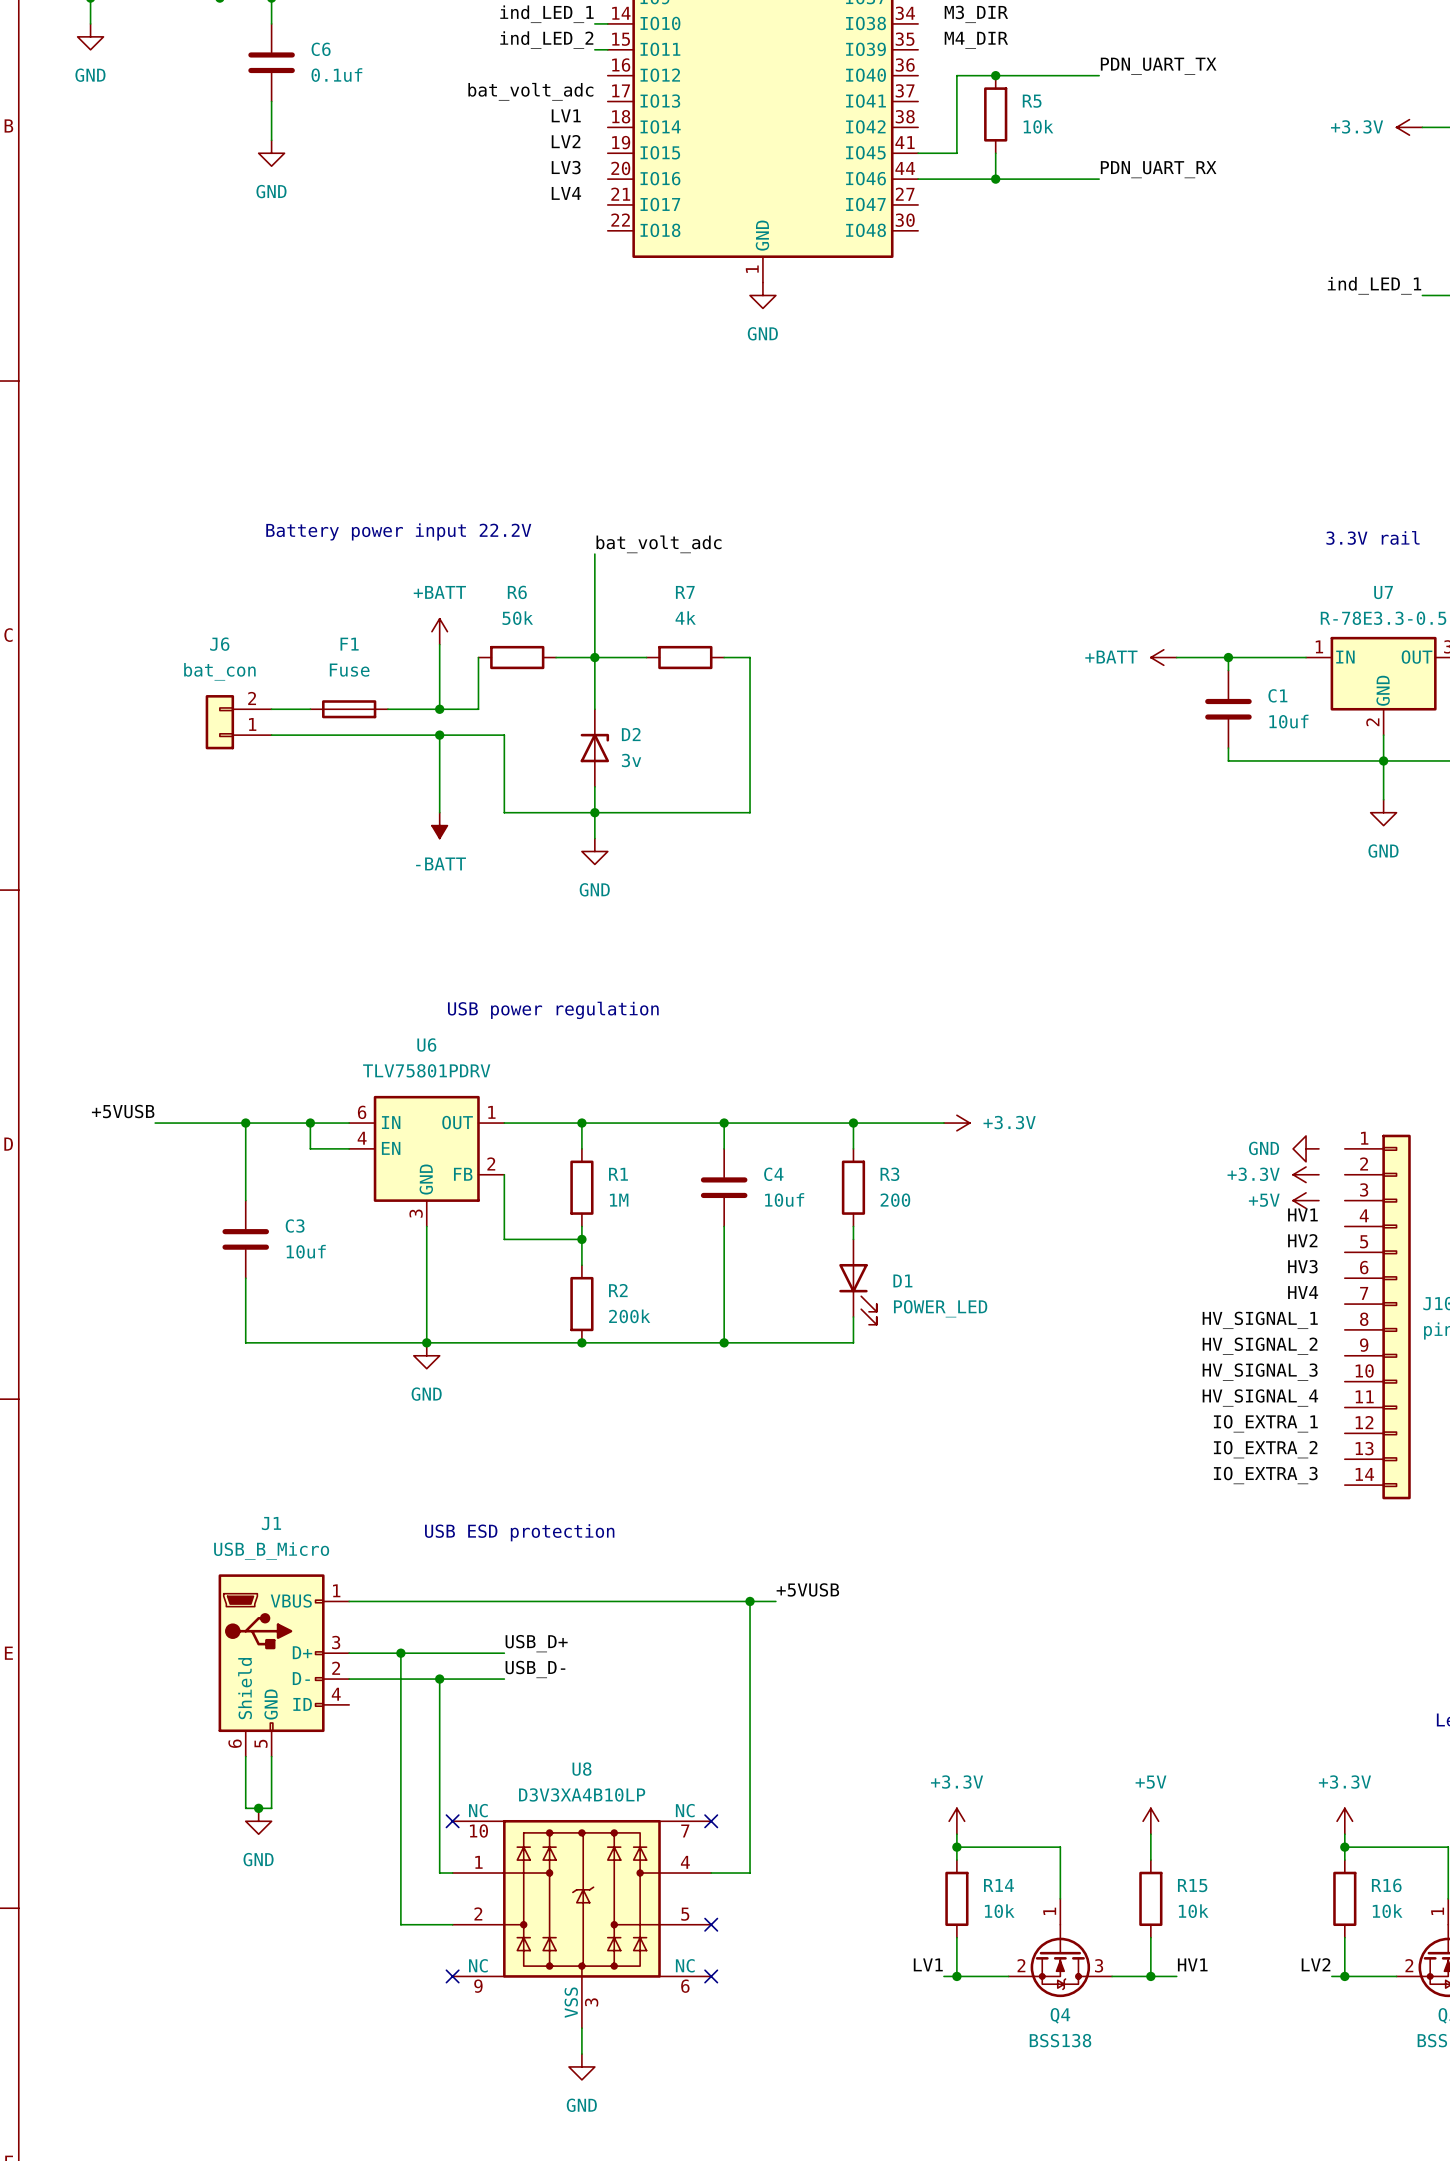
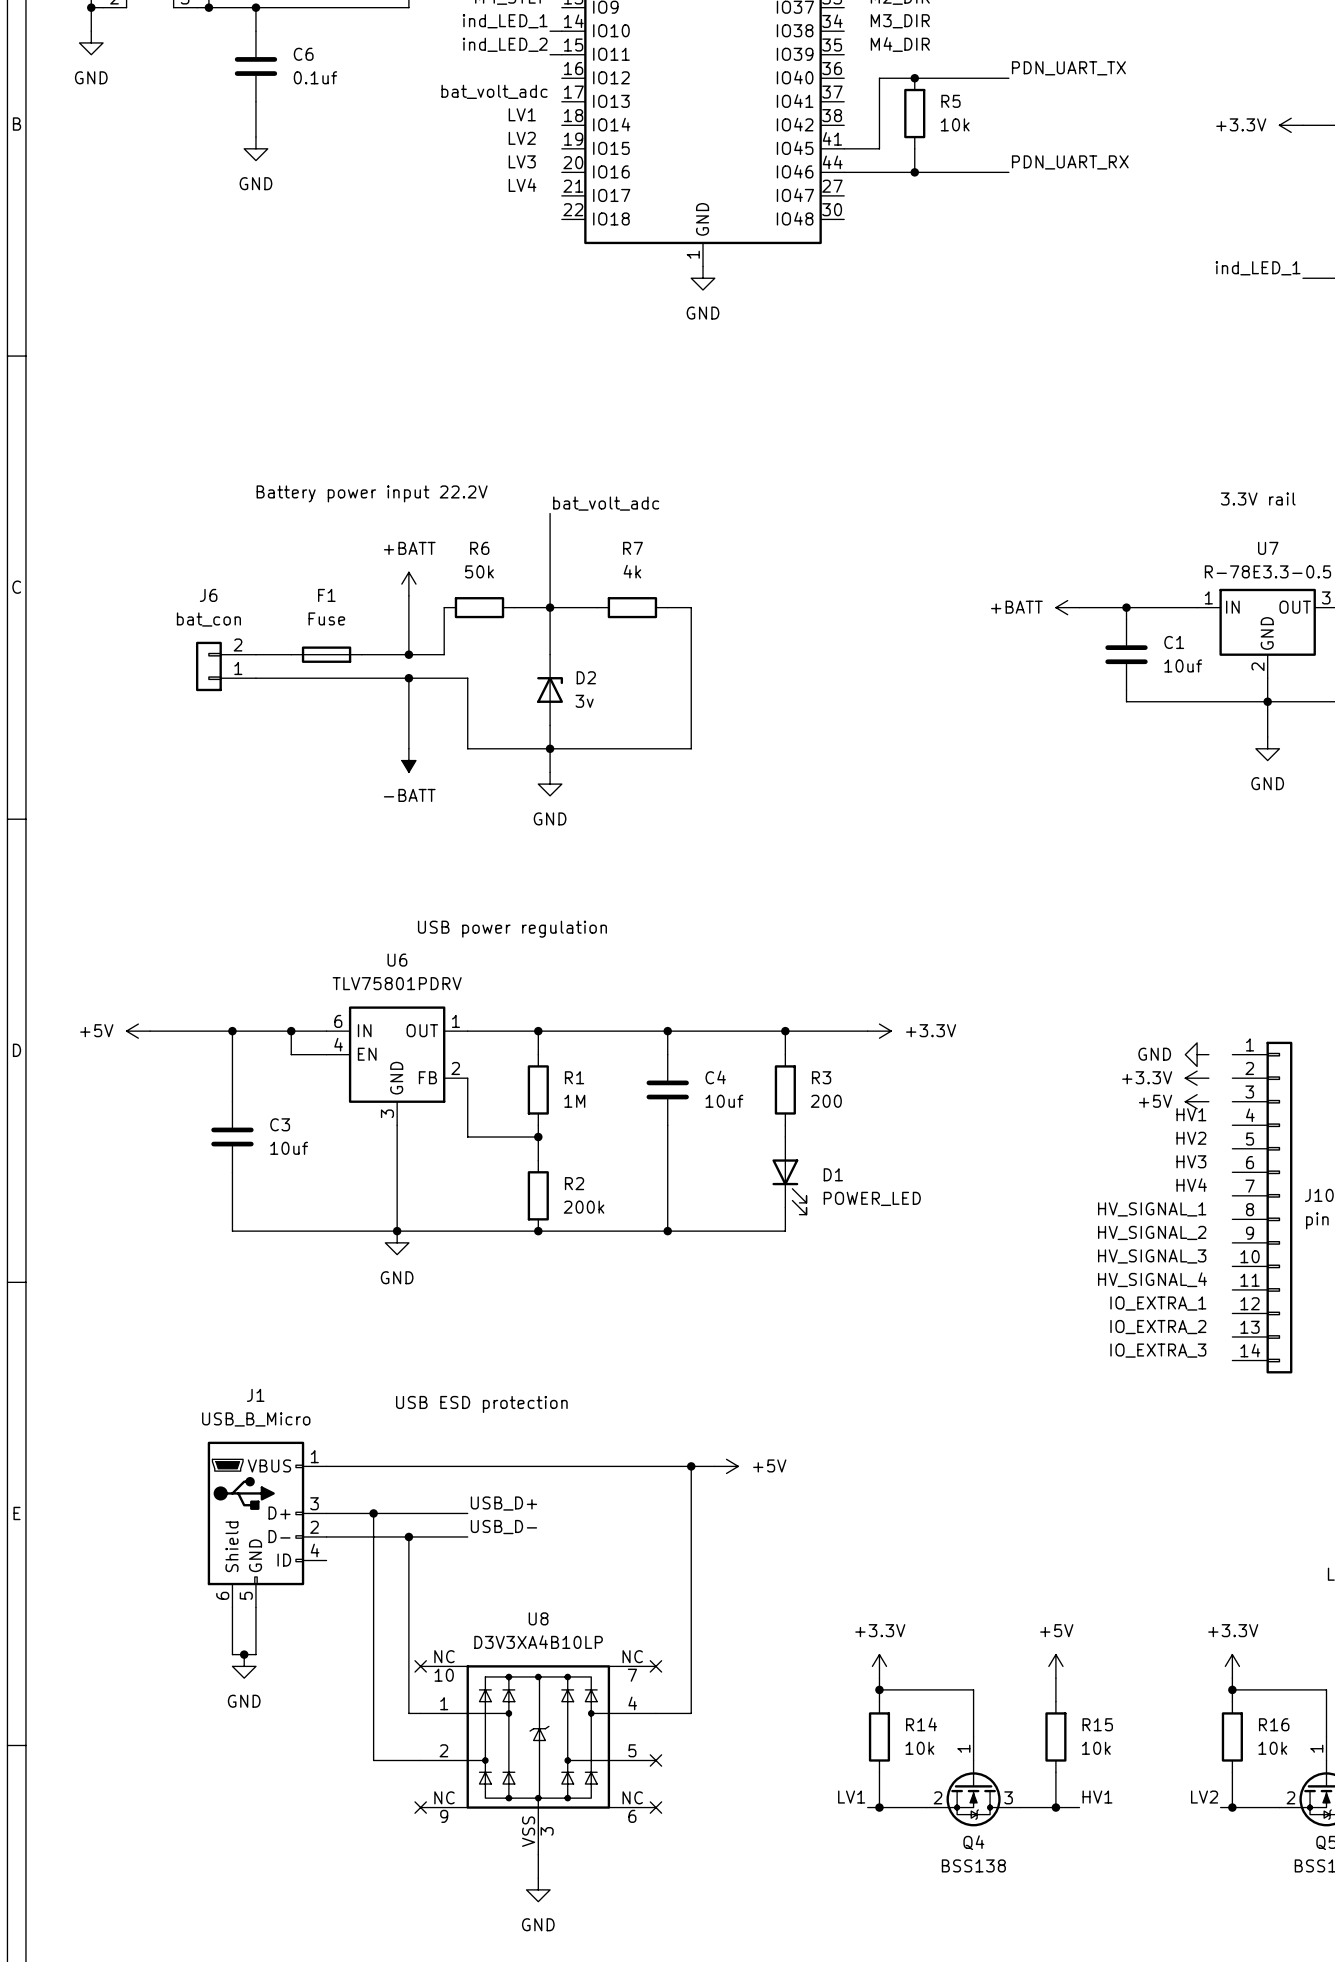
label: +5VUSB (123, 1111) -> none
power symbol: none -> +5V (138, 1031)
label: +5VUSB (807, 1589) -> none
power symbol: none -> +5V (726, 1466)

